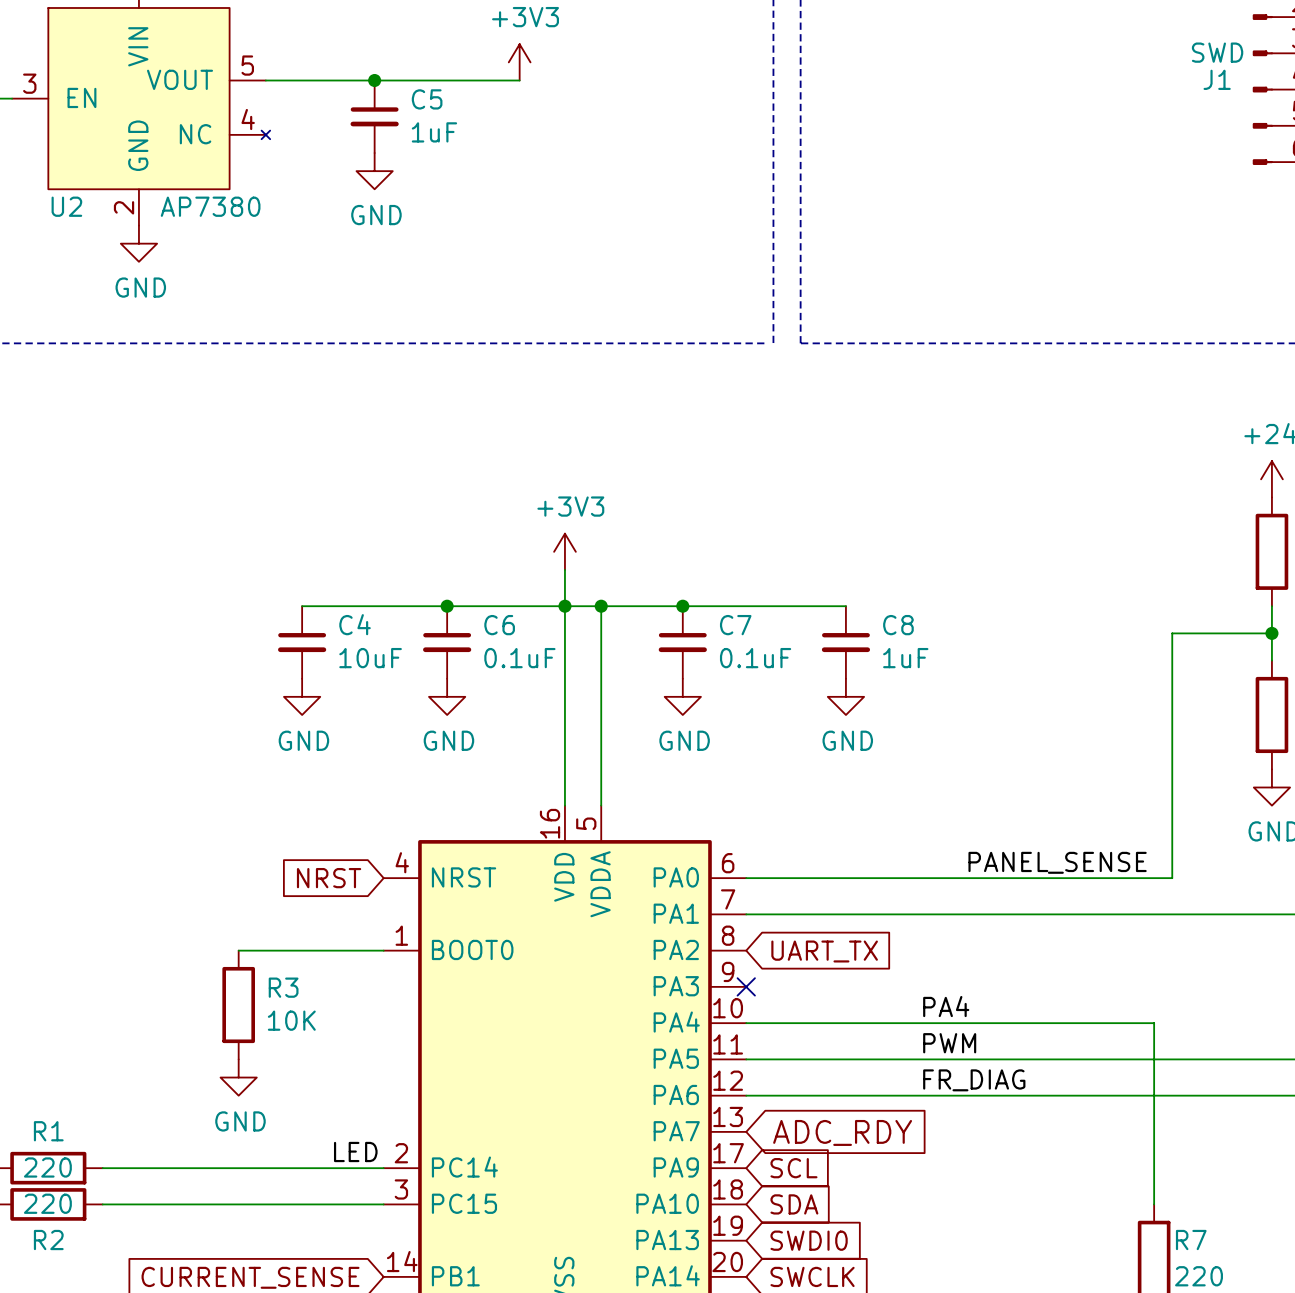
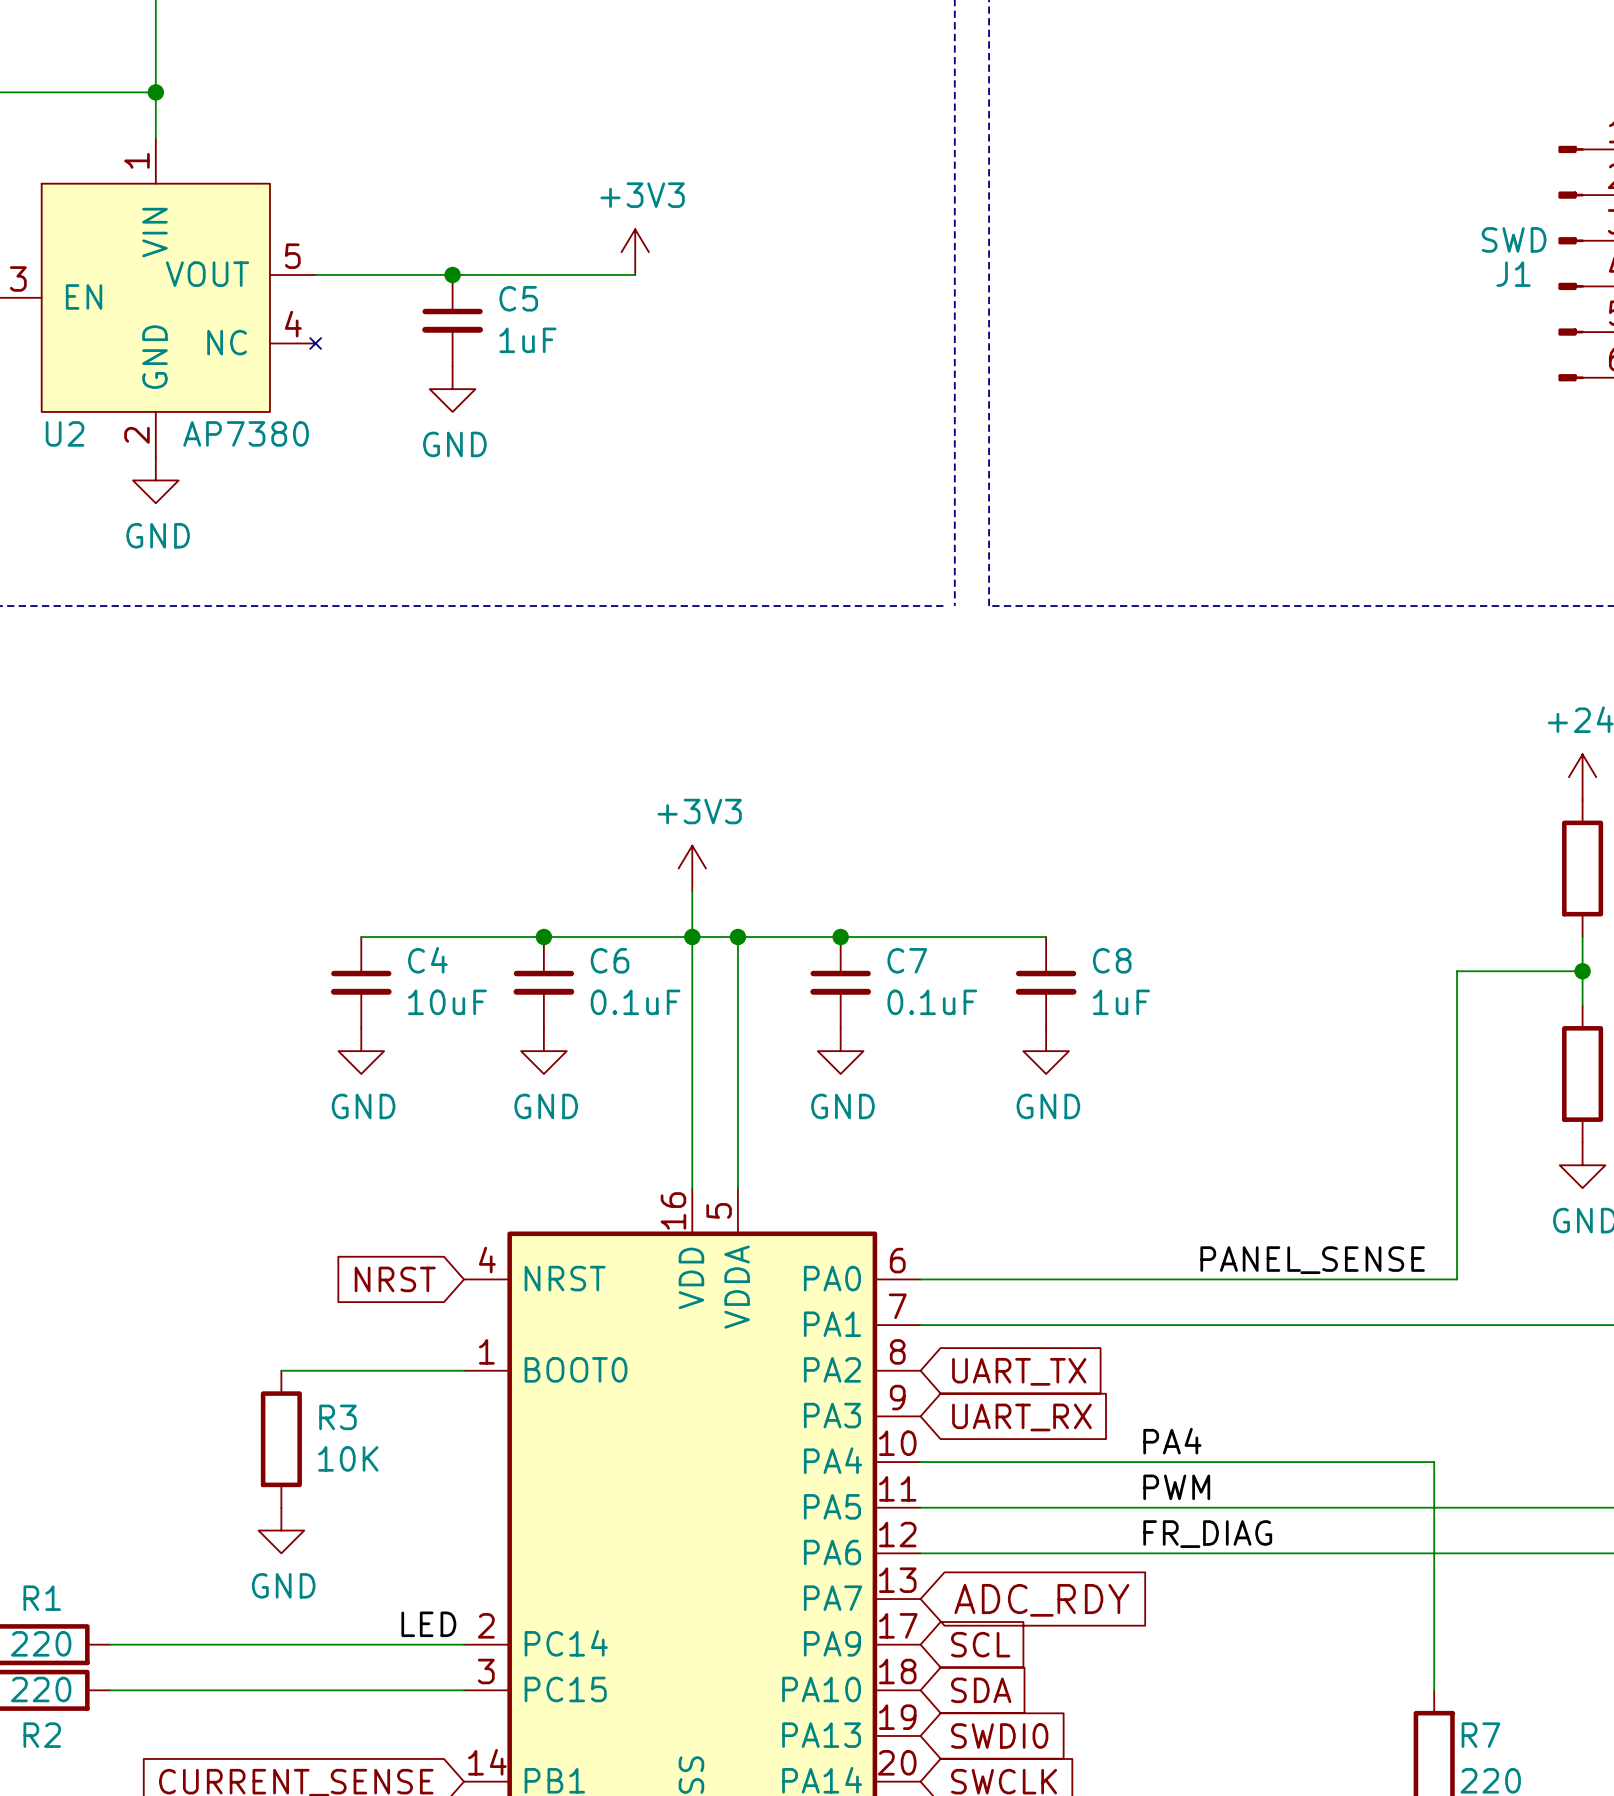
no-connect mark: (746, 986) -> none
global label: none -> UART_RX (1021, 1417)

